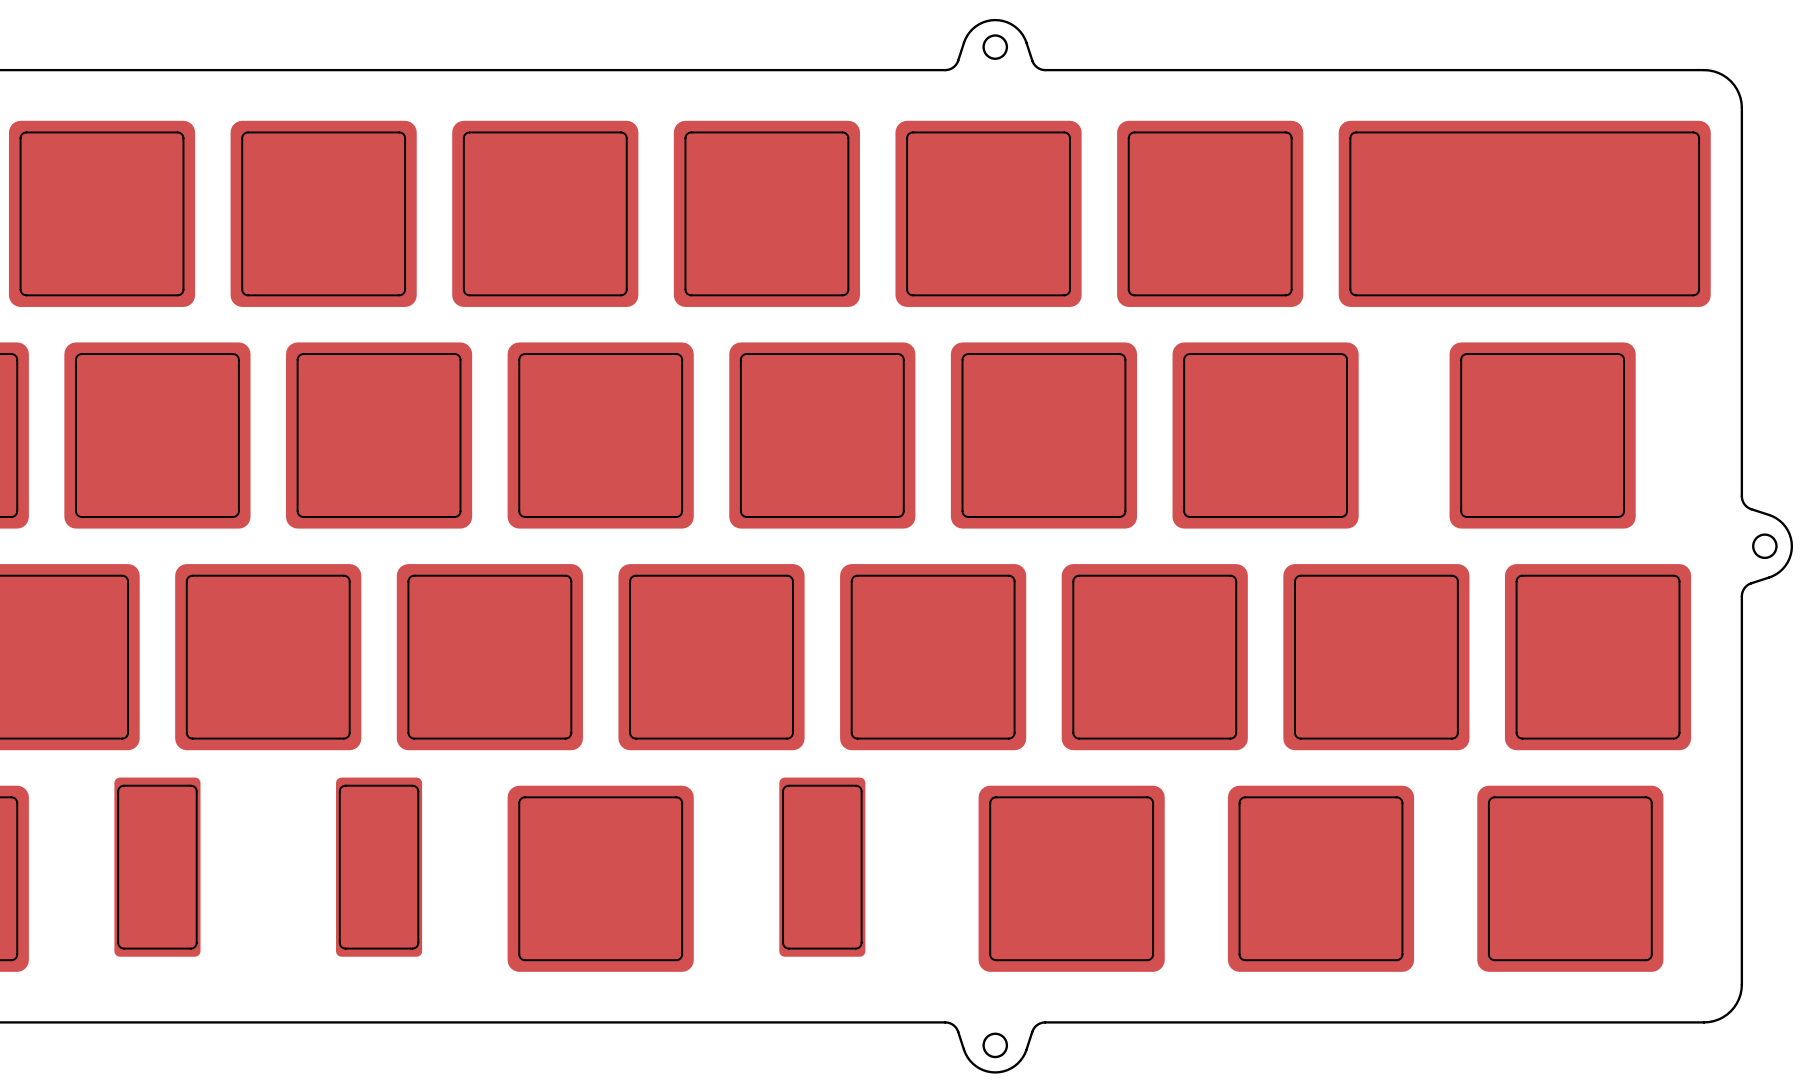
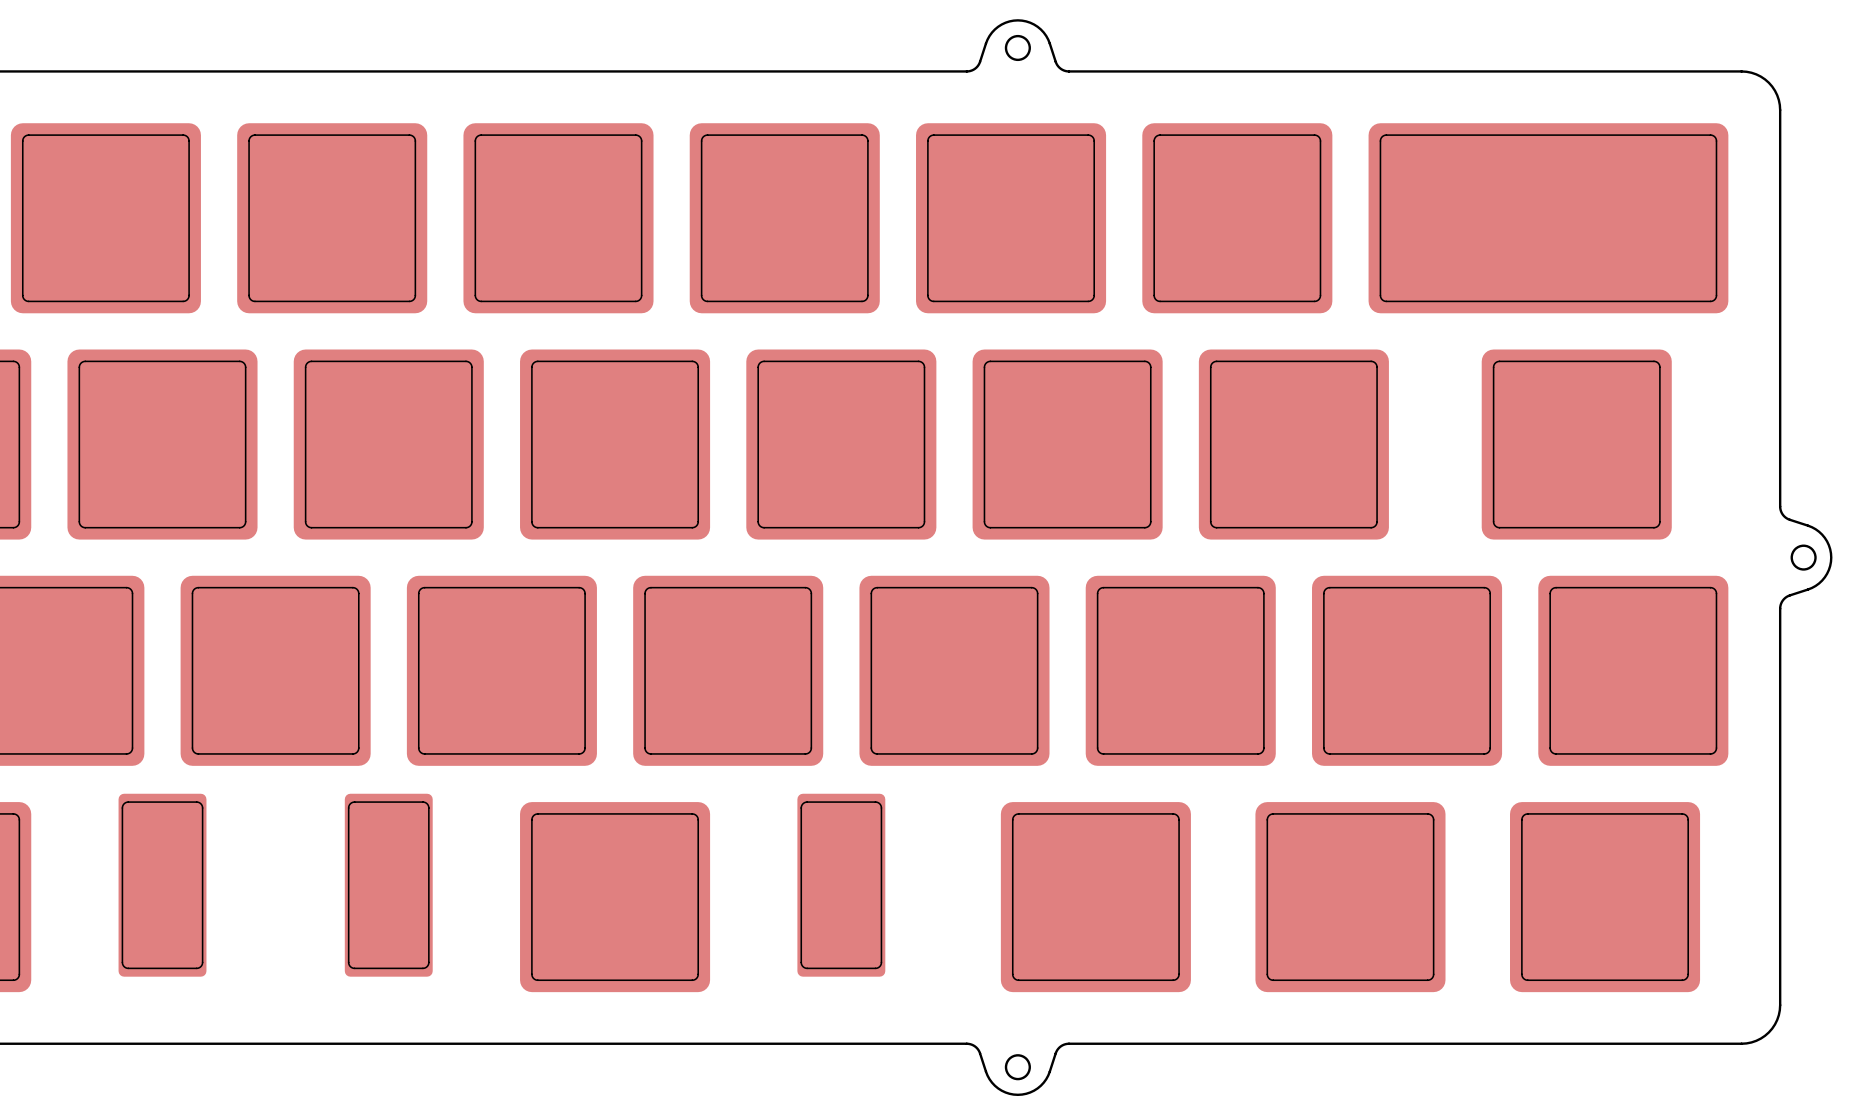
part footprint: [1338, 120, 1711, 307] -> [1368, 123, 1729, 314]

